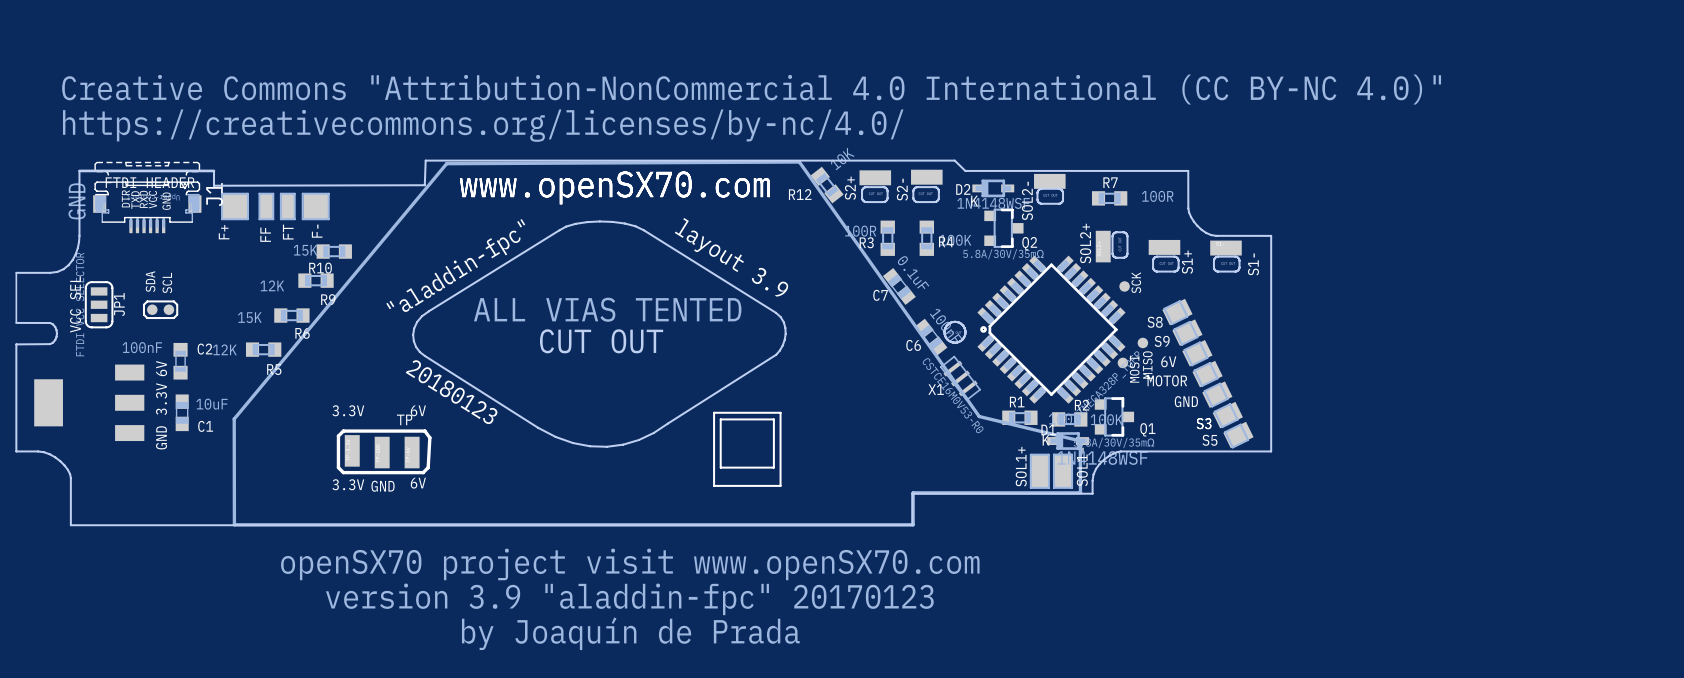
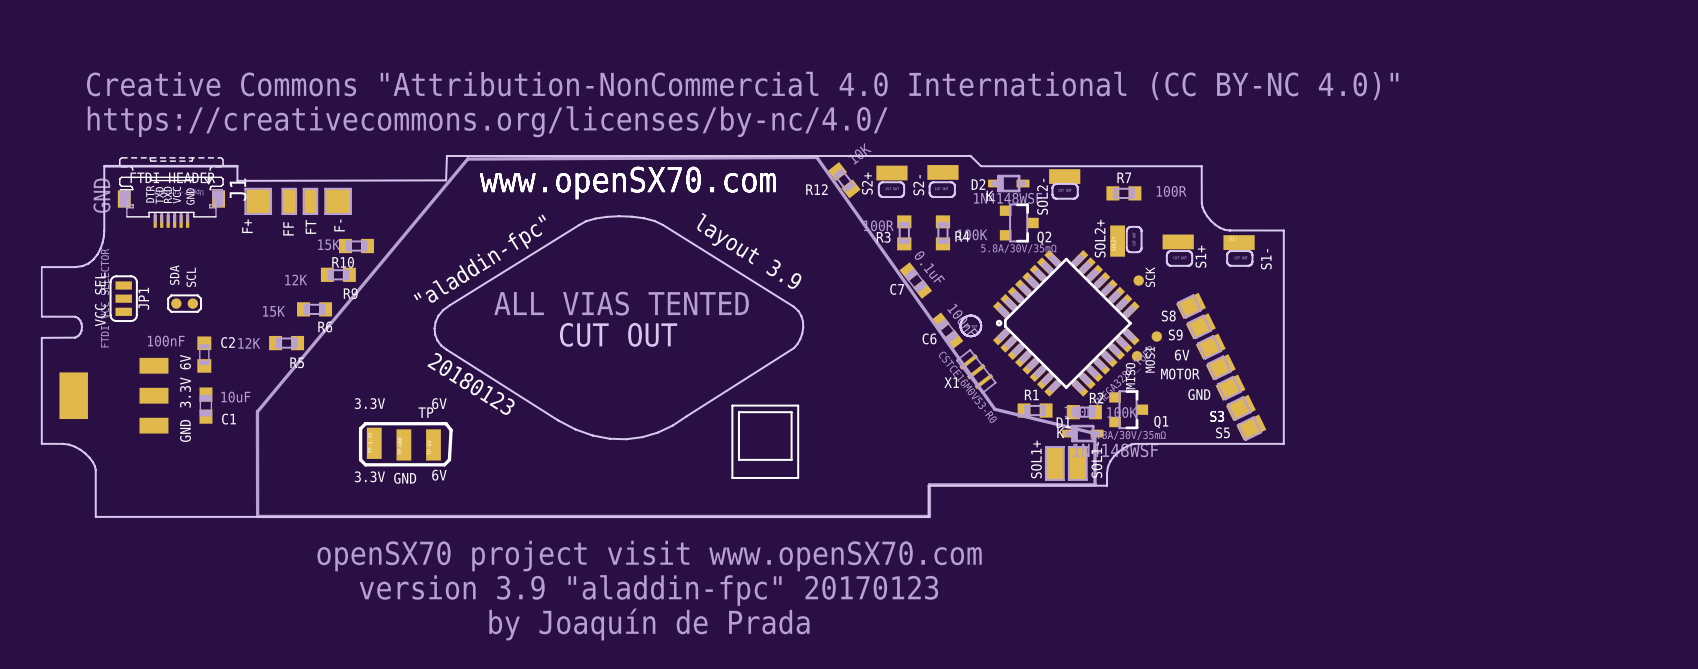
MISO name: MISO (1147, 365) -> MOSI (1150, 359)
MOSI name: MOSI (1134, 369) -> MISO (1130, 376)

